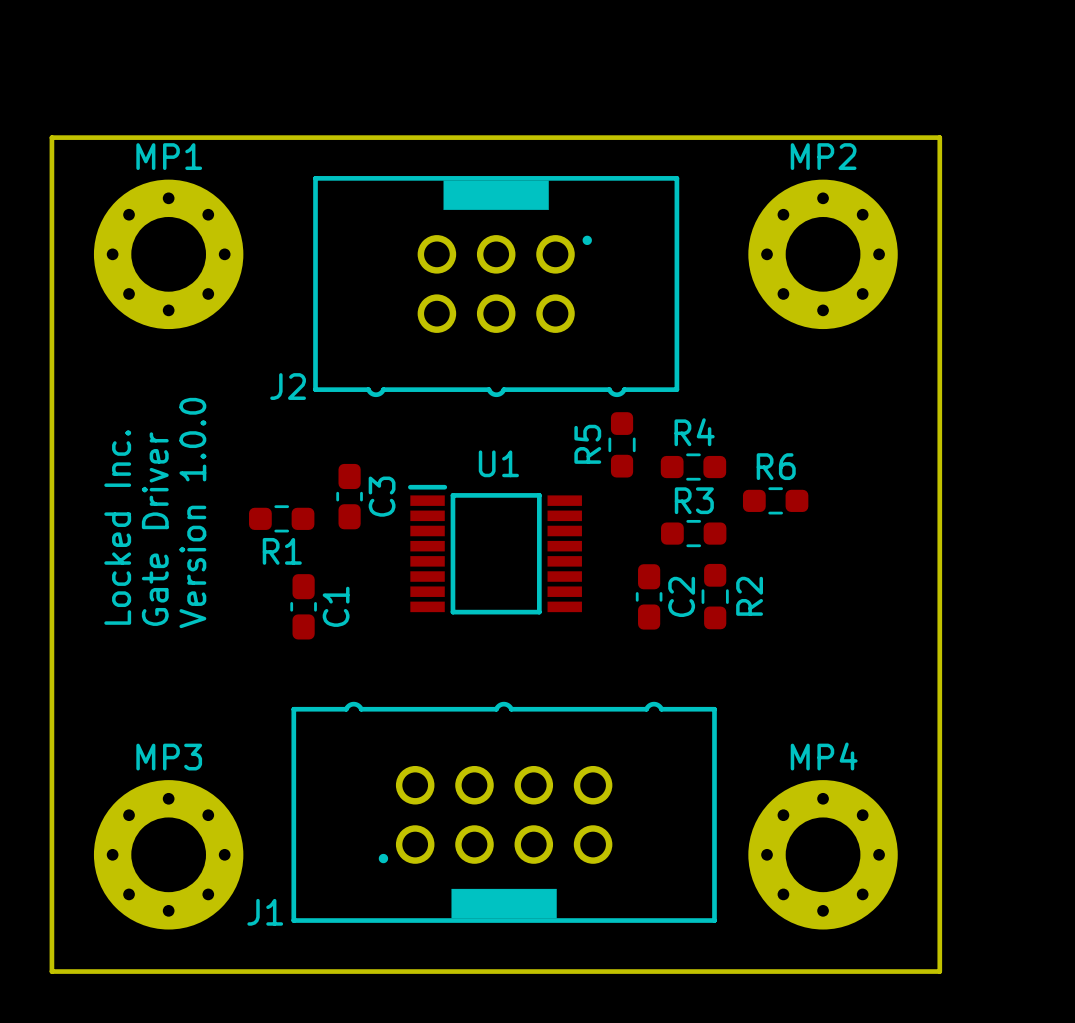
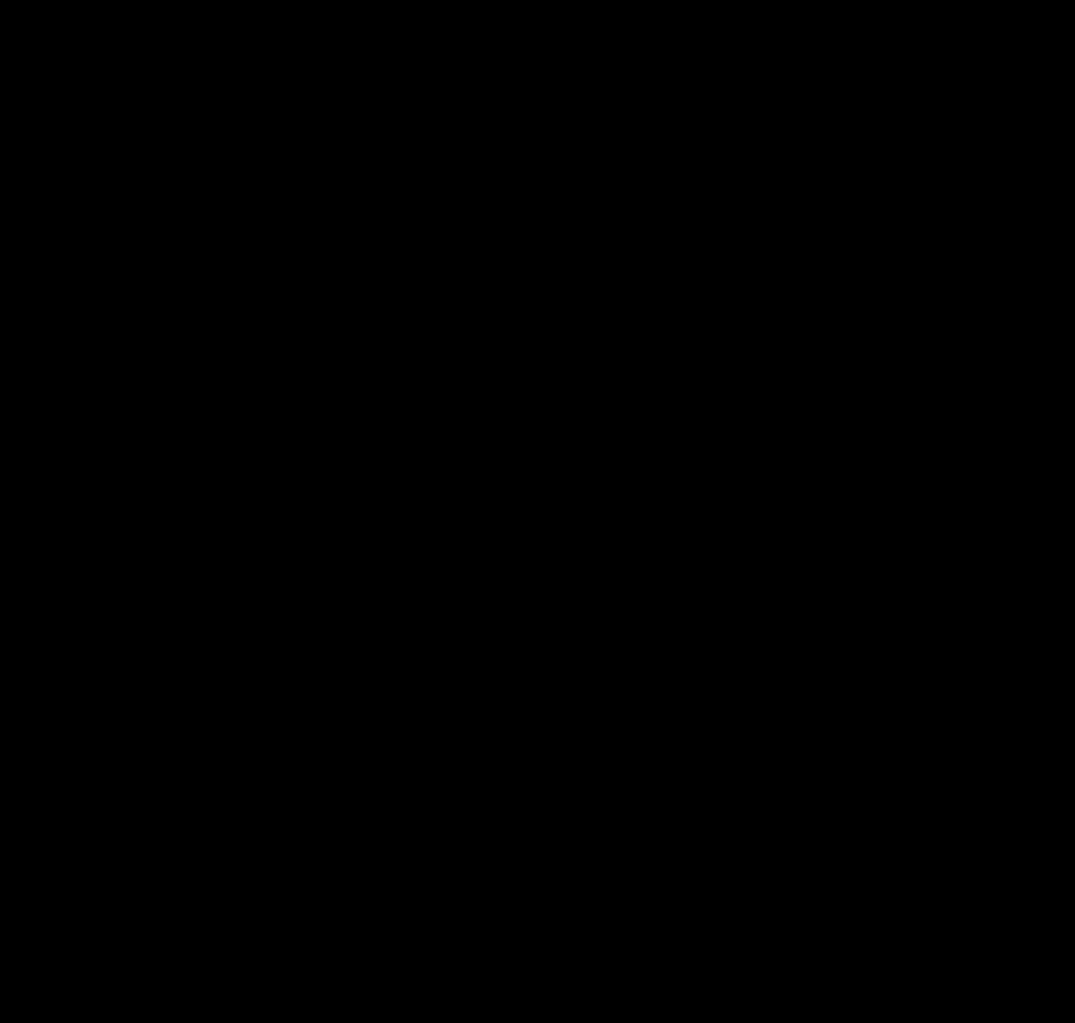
board edge: (51, 137) (939, 137) (939, 971) (51, 971) (51, 137) -> none
MP1: (168, 254) -> none
MP2: (823, 254) -> none
J2: (496, 286) -> none
R5: (622, 444) -> none
R4: (693, 467) -> none
C3: (349, 496) -> none
R6: (775, 500) -> none
text: Version 1.0.0 (192, 513) -> none
R1: (281, 518) -> none
text: Locked Inc. (117, 527) -> none
text: Gate Driver (155, 529) -> none
R3: (693, 533) -> none
U1: (494, 549) -> none
C2: (649, 596) -> none
R2: (715, 596) -> none
C1: (303, 606) -> none
J1: (504, 812) -> none
MP3: (168, 854) -> none
MP4: (823, 854) -> none

